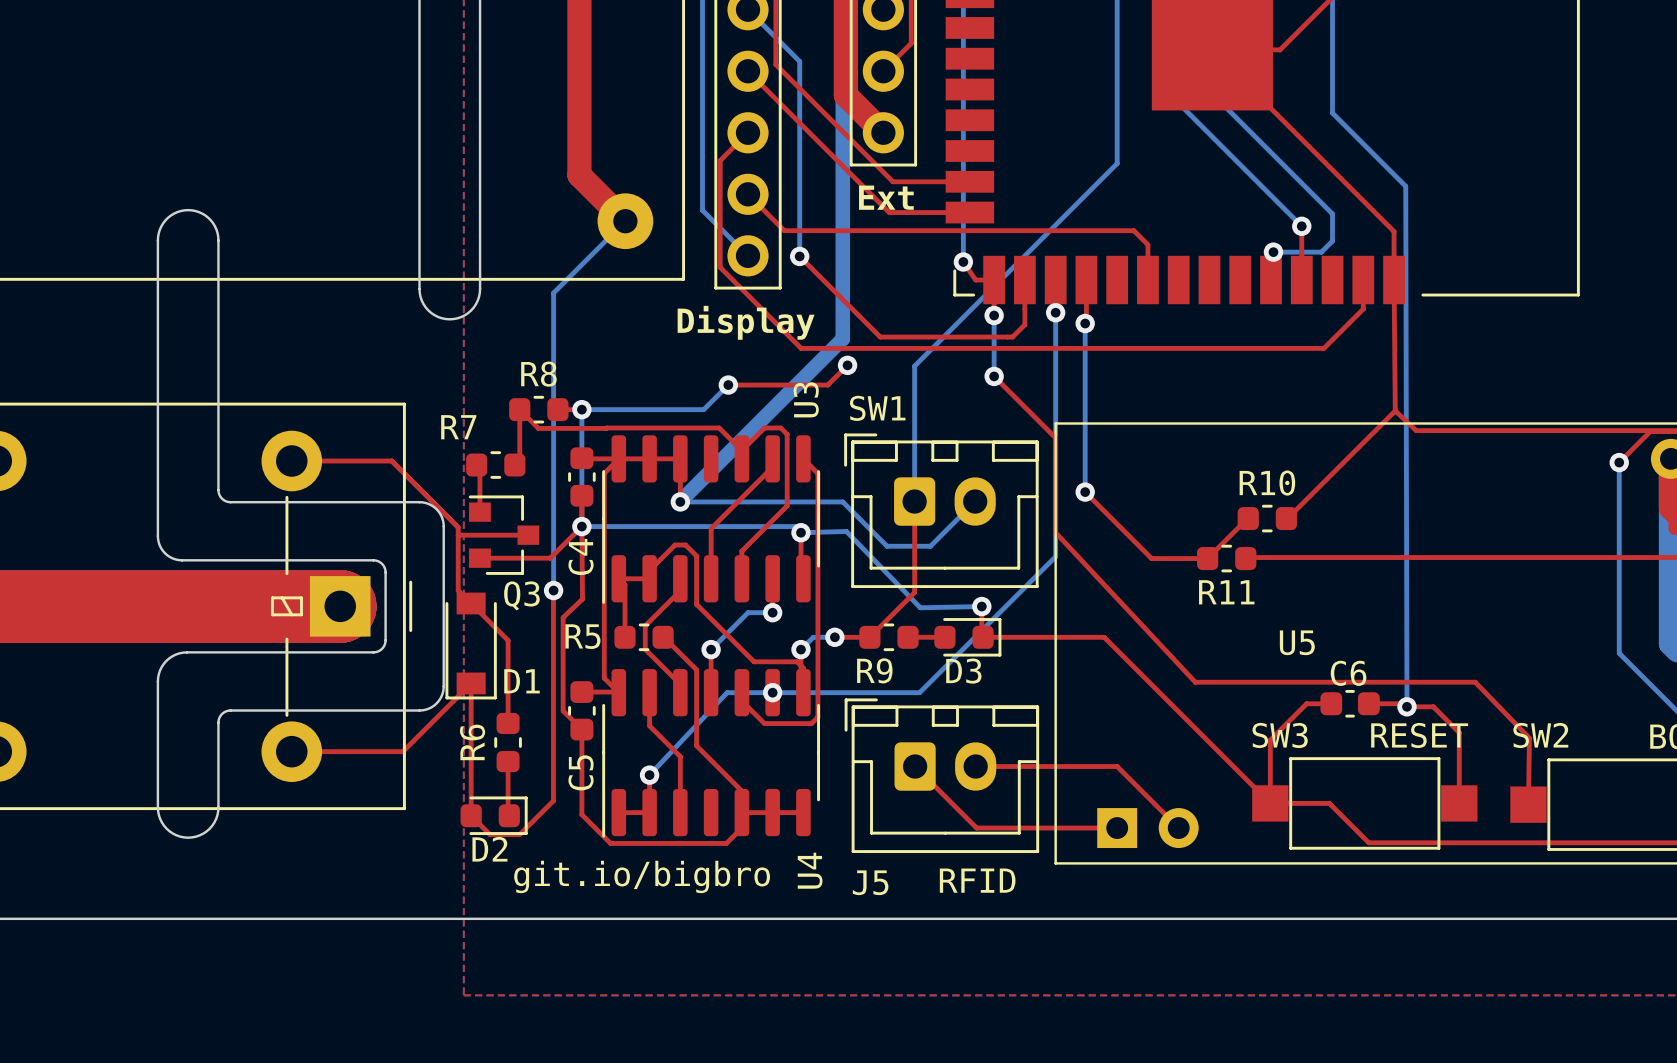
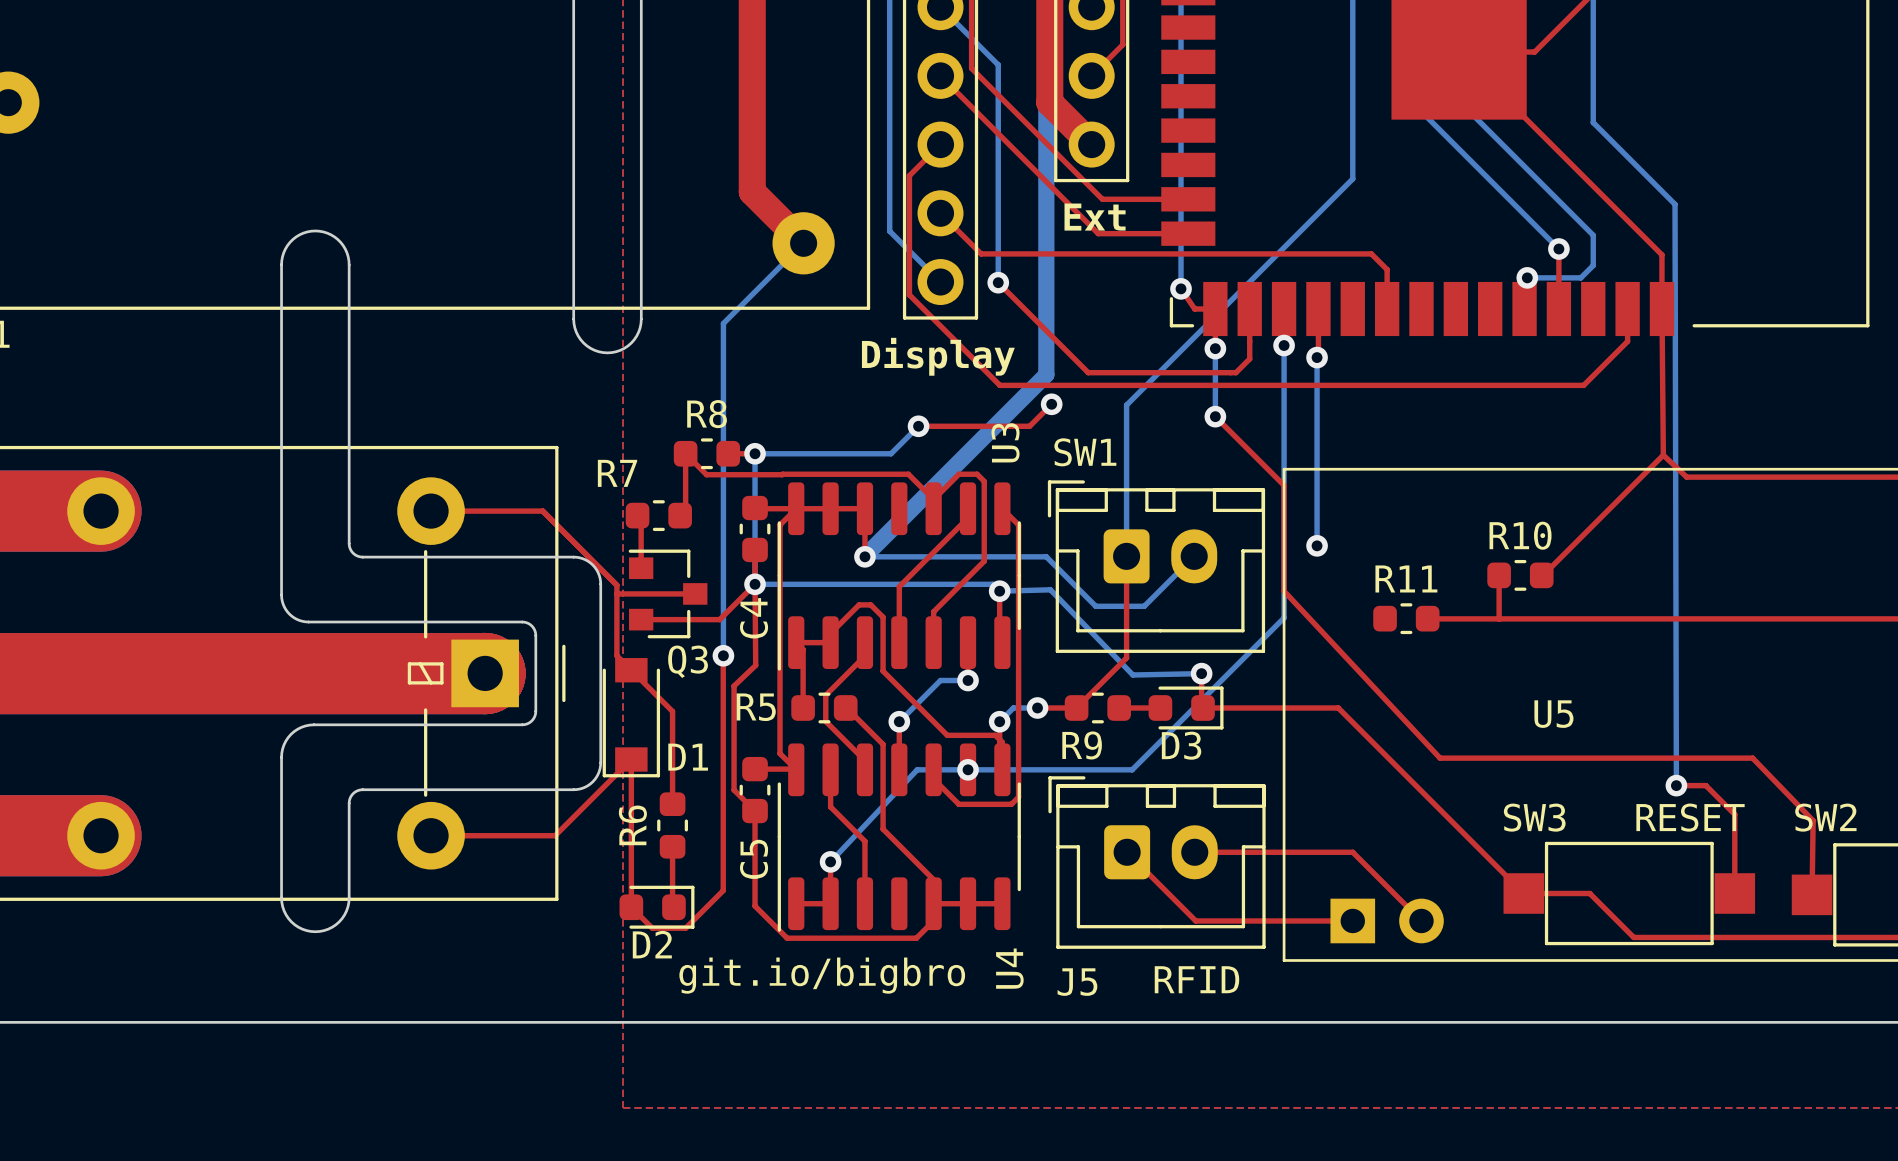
top track: (1085, 492) (1151, 558) (1207, 558) (1248, 518) -> (1427, 618) (1499, 618) (1499, 575)
R11 position: (1226, 558) -> (1406, 618)
R11 name position: R11 (1226, 592) -> R11 (1406, 578)
top track: (1331, 703) (1306, 703) (1270, 740) (1270, 803) -> none
C6: (1350, 703) -> none
top track: (1368, 703) (1403, 703) (1406, 706) -> none

